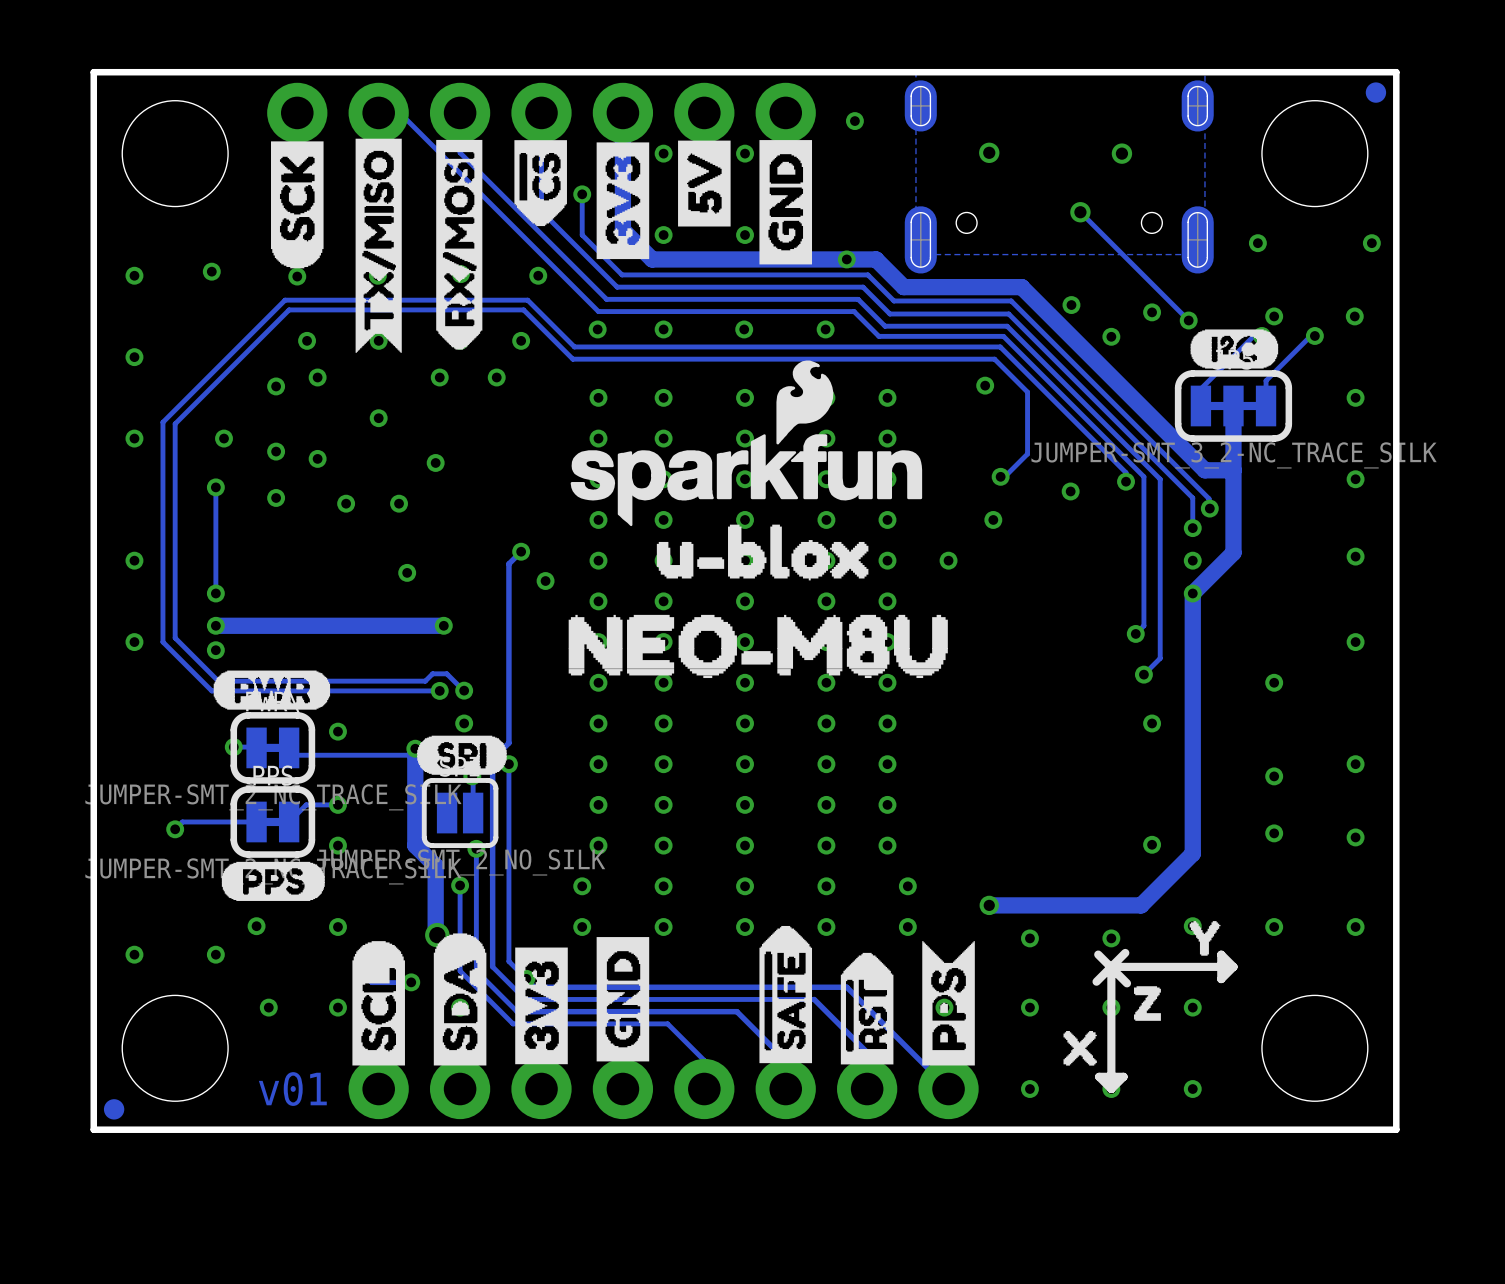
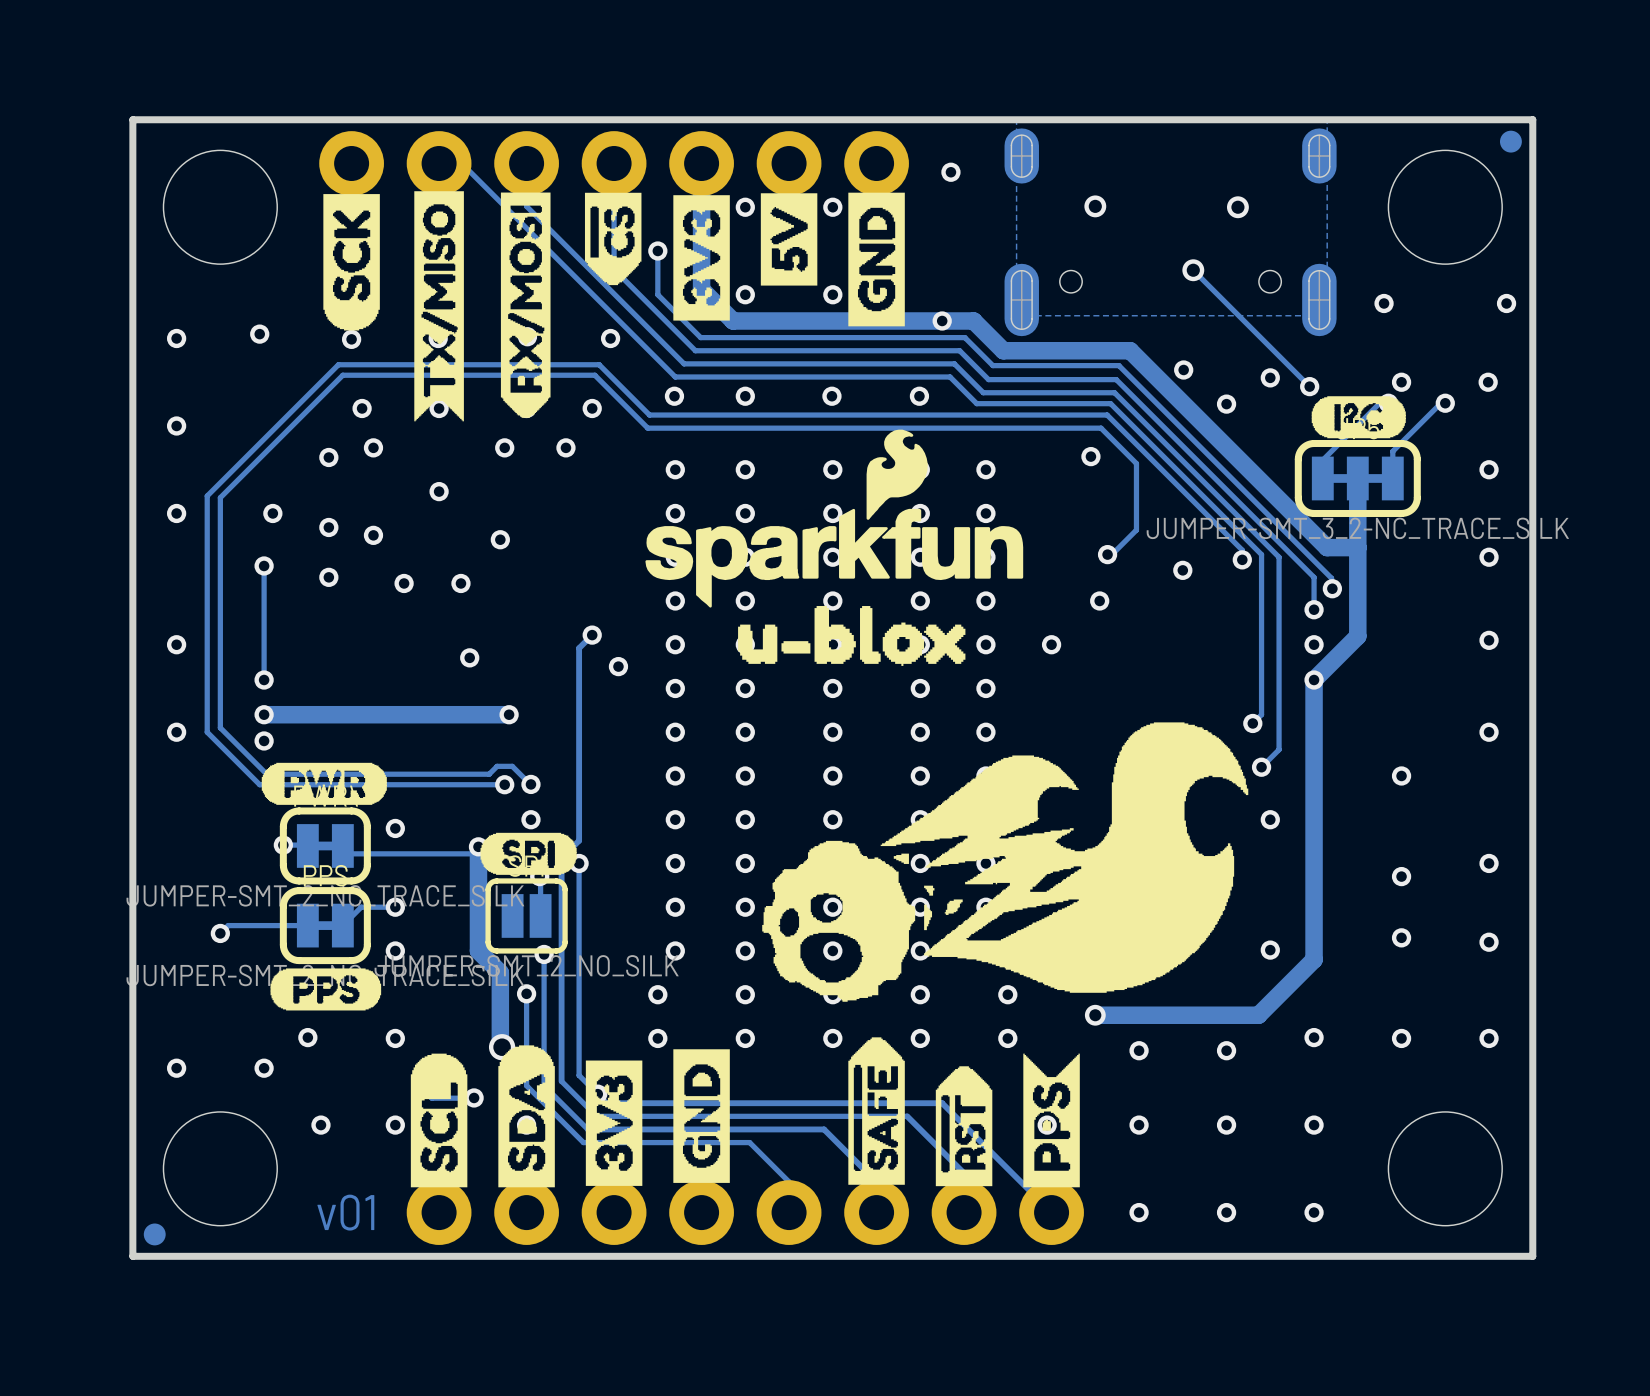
drawing: [568, 614, 948, 679] -> none
drawing: none -> [762, 722, 1249, 1002]
drawing: [1189, 921, 1221, 956] -> none
line: (1125, 952) (1096, 981) -> none
line: (1098, 954) (1127, 983) -> none
line: (1233, 966) (1111, 966) (1111, 1089) -> none
line: (1233, 966) (1221, 979) (1221, 954) (1233, 966) -> none
drawing: [1133, 986, 1161, 1021] -> none
drawing: [1063, 1031, 1097, 1066] -> none
line: (1111, 1089) (1099, 1076) (1123, 1076) (1111, 1089) -> none

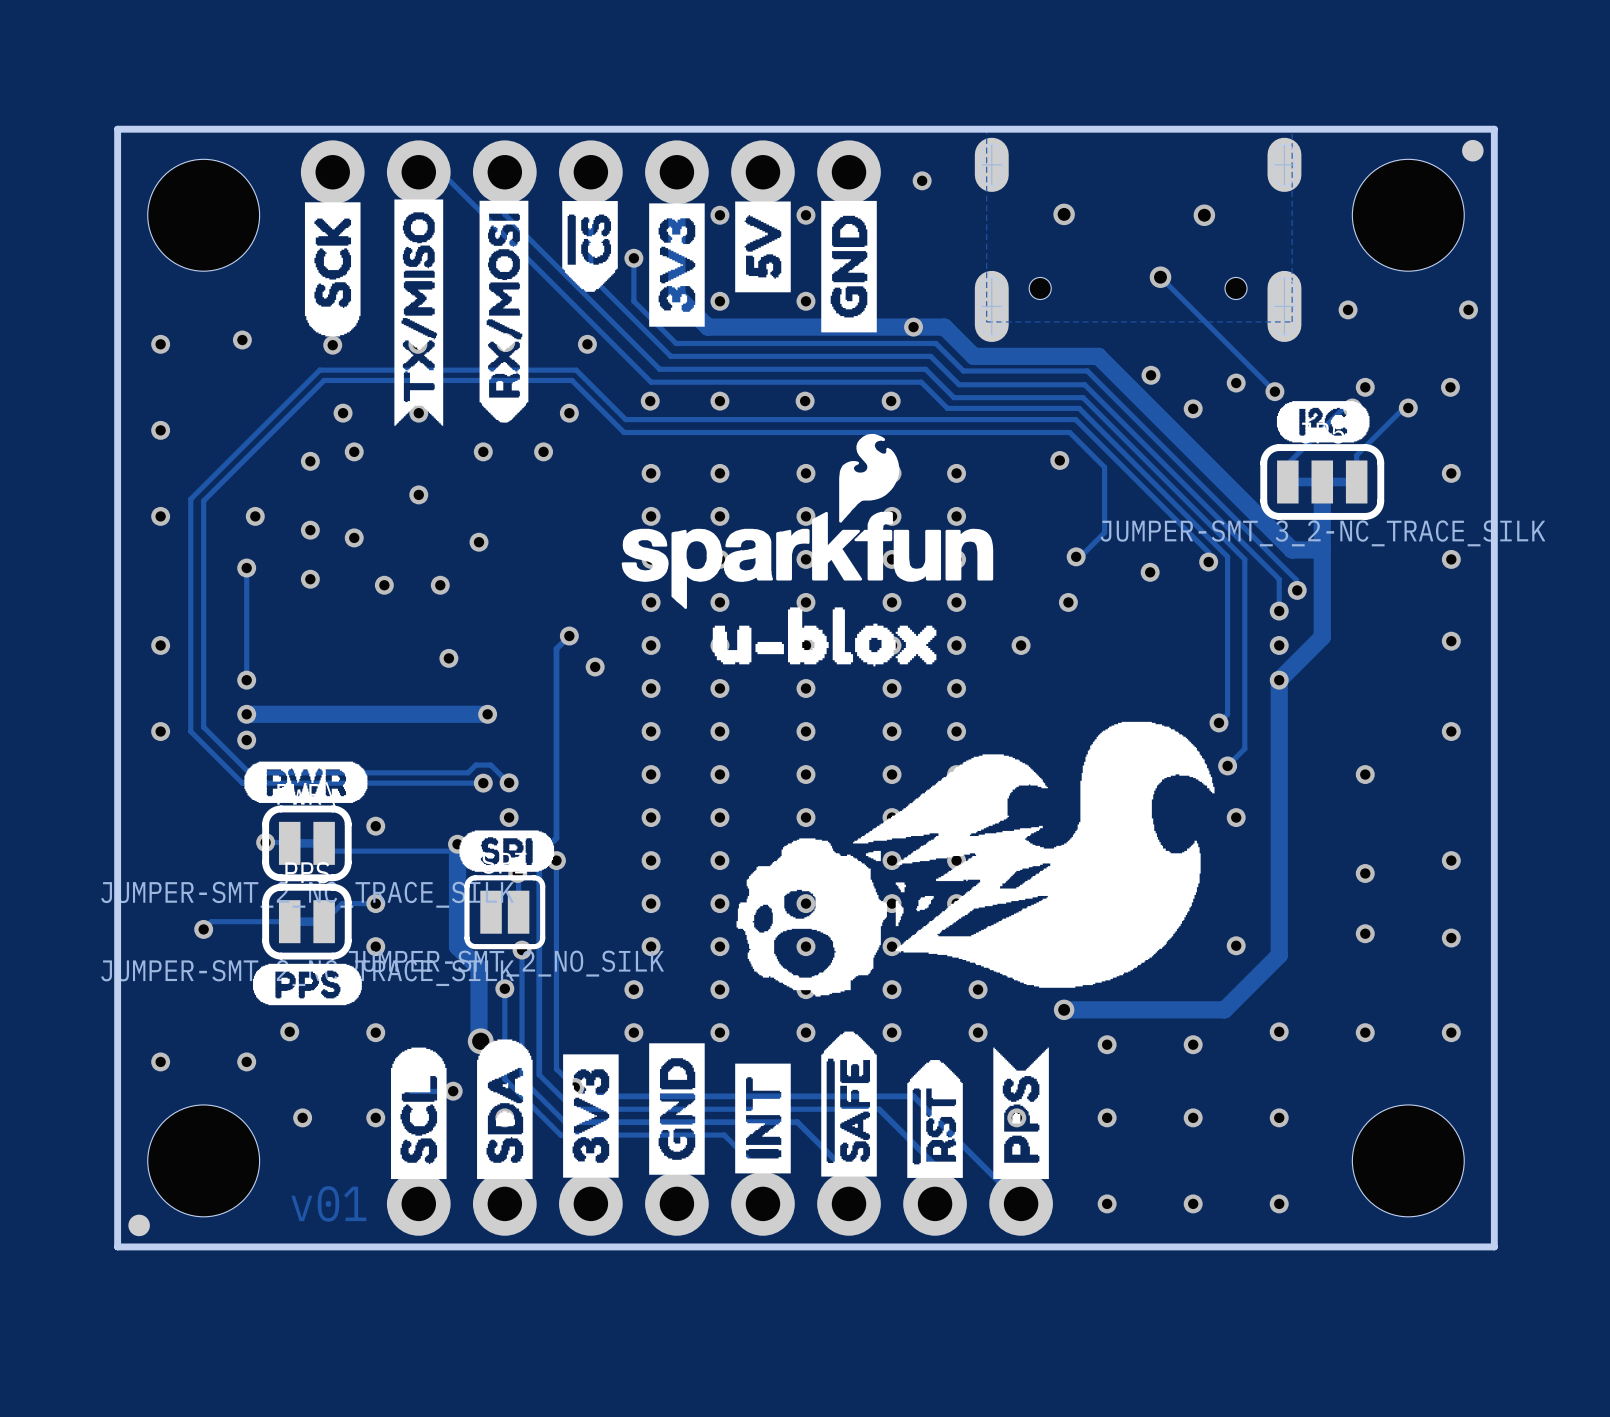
drawing: none -> [735, 1063, 791, 1174]

